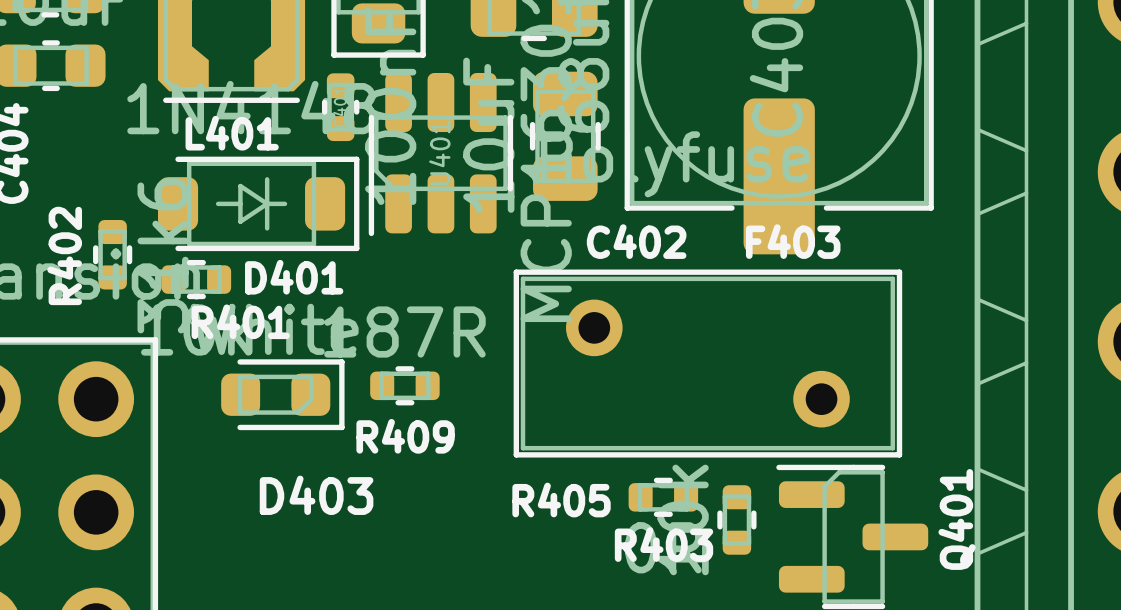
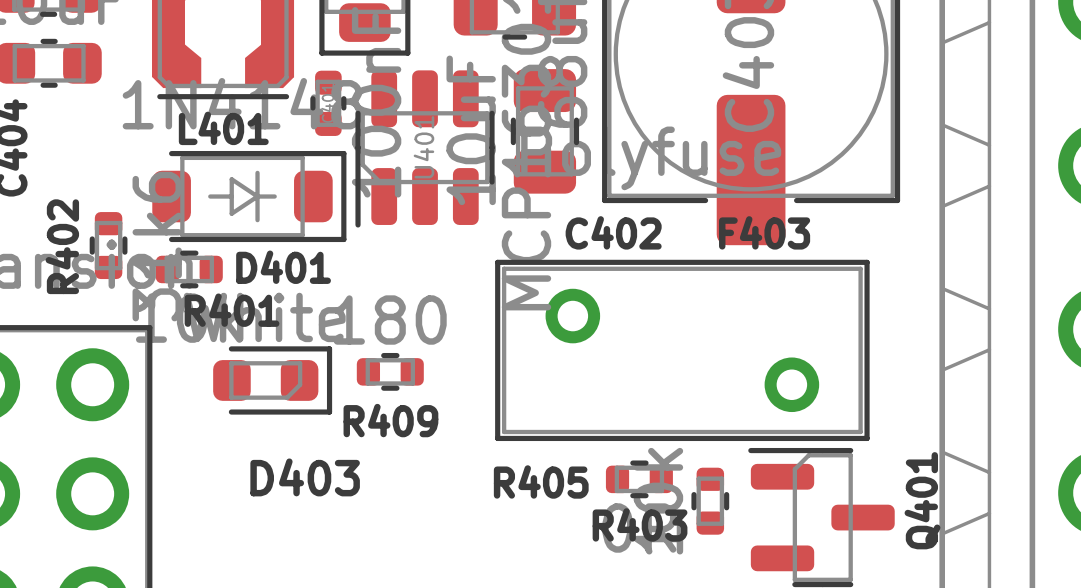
R409 value: 187R (404, 332) -> 180 (390, 320)

